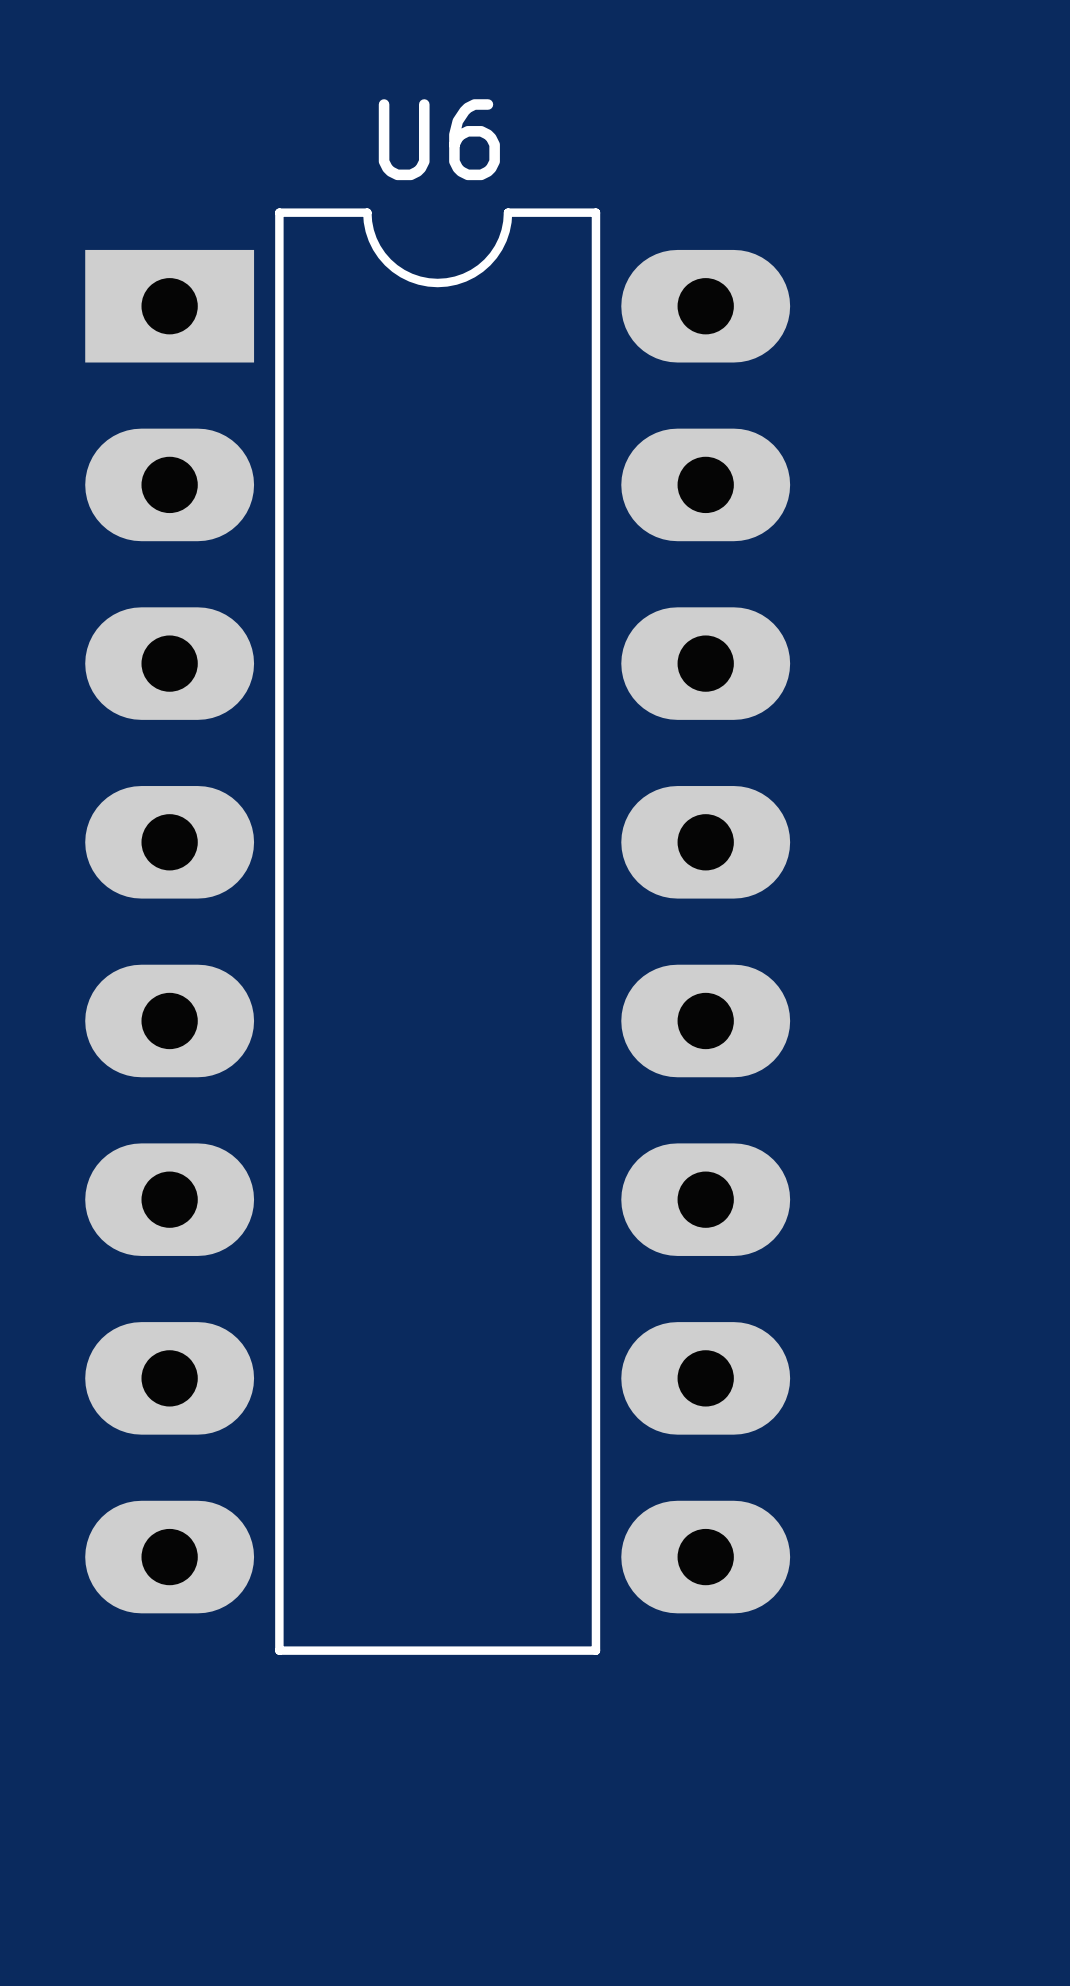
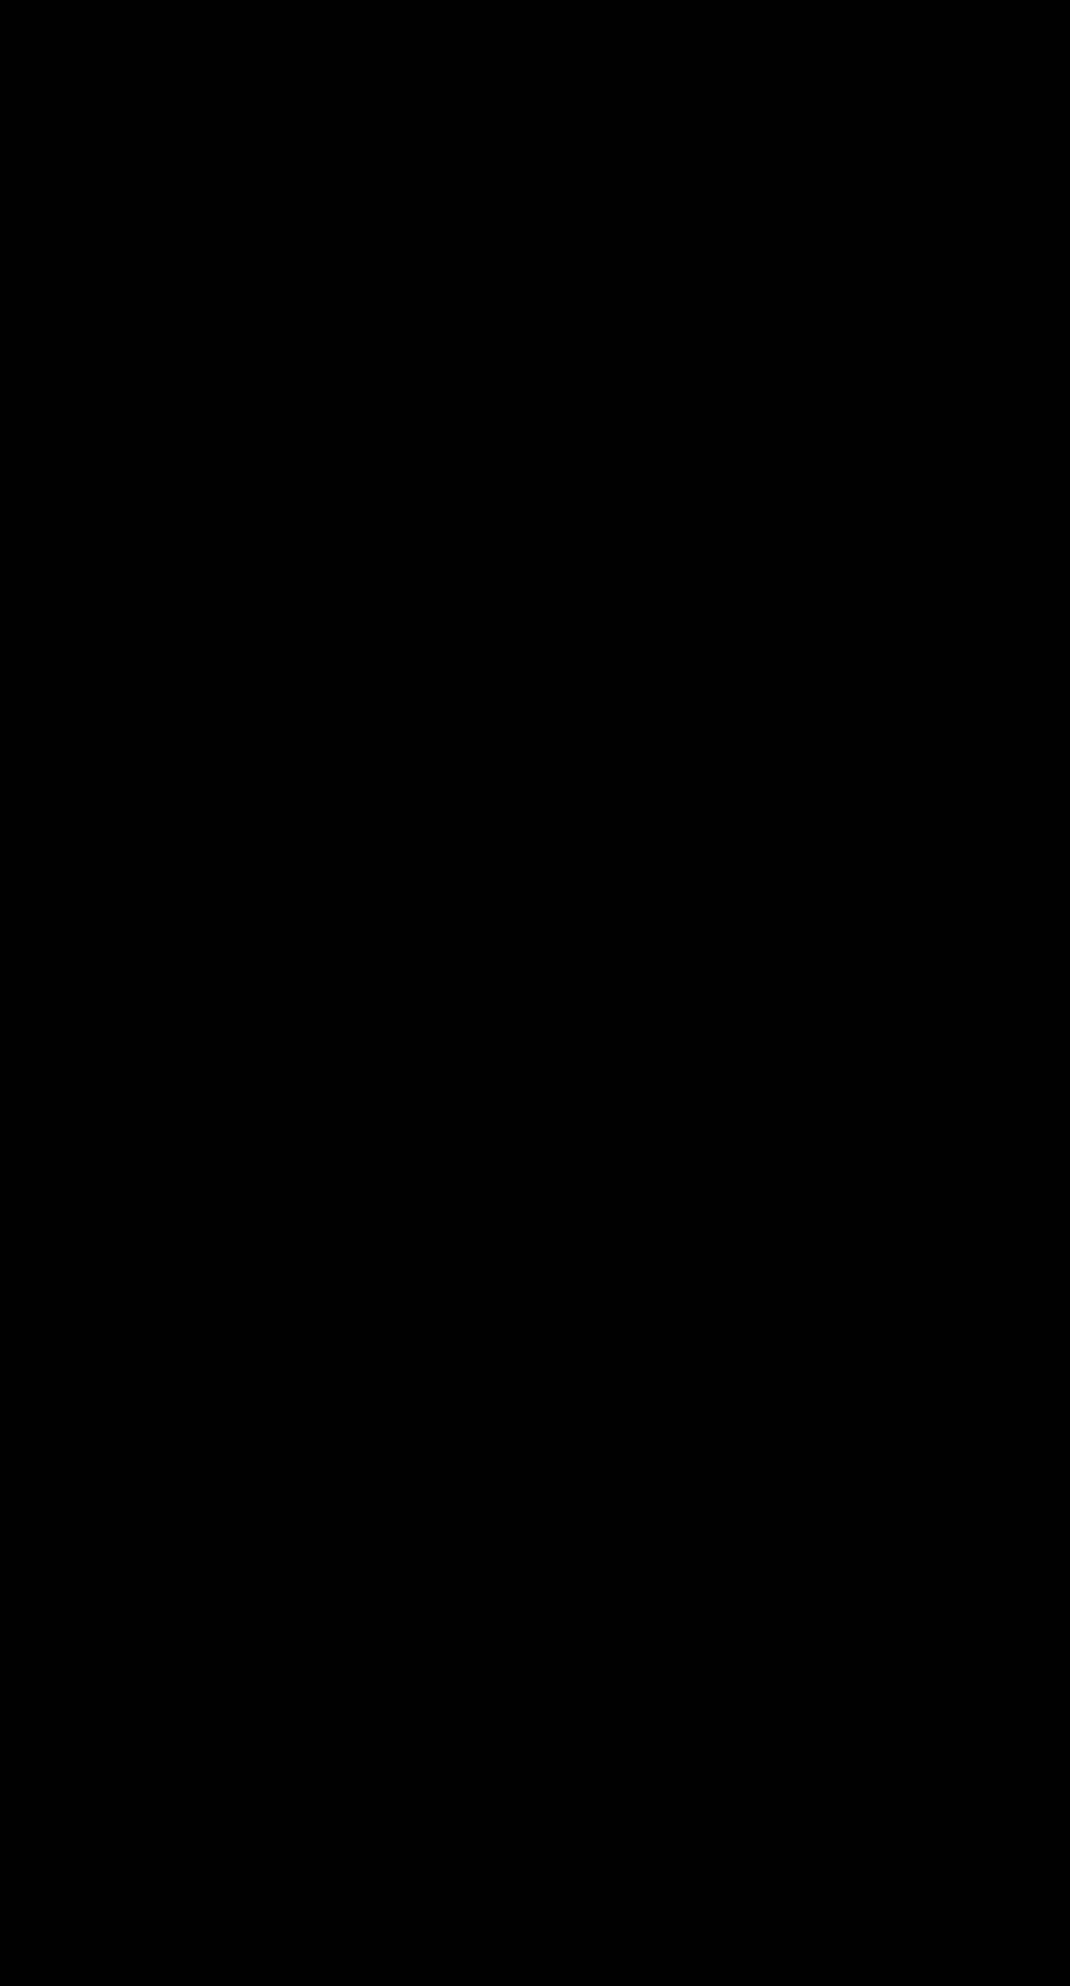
U6: (437, 931) -> none

